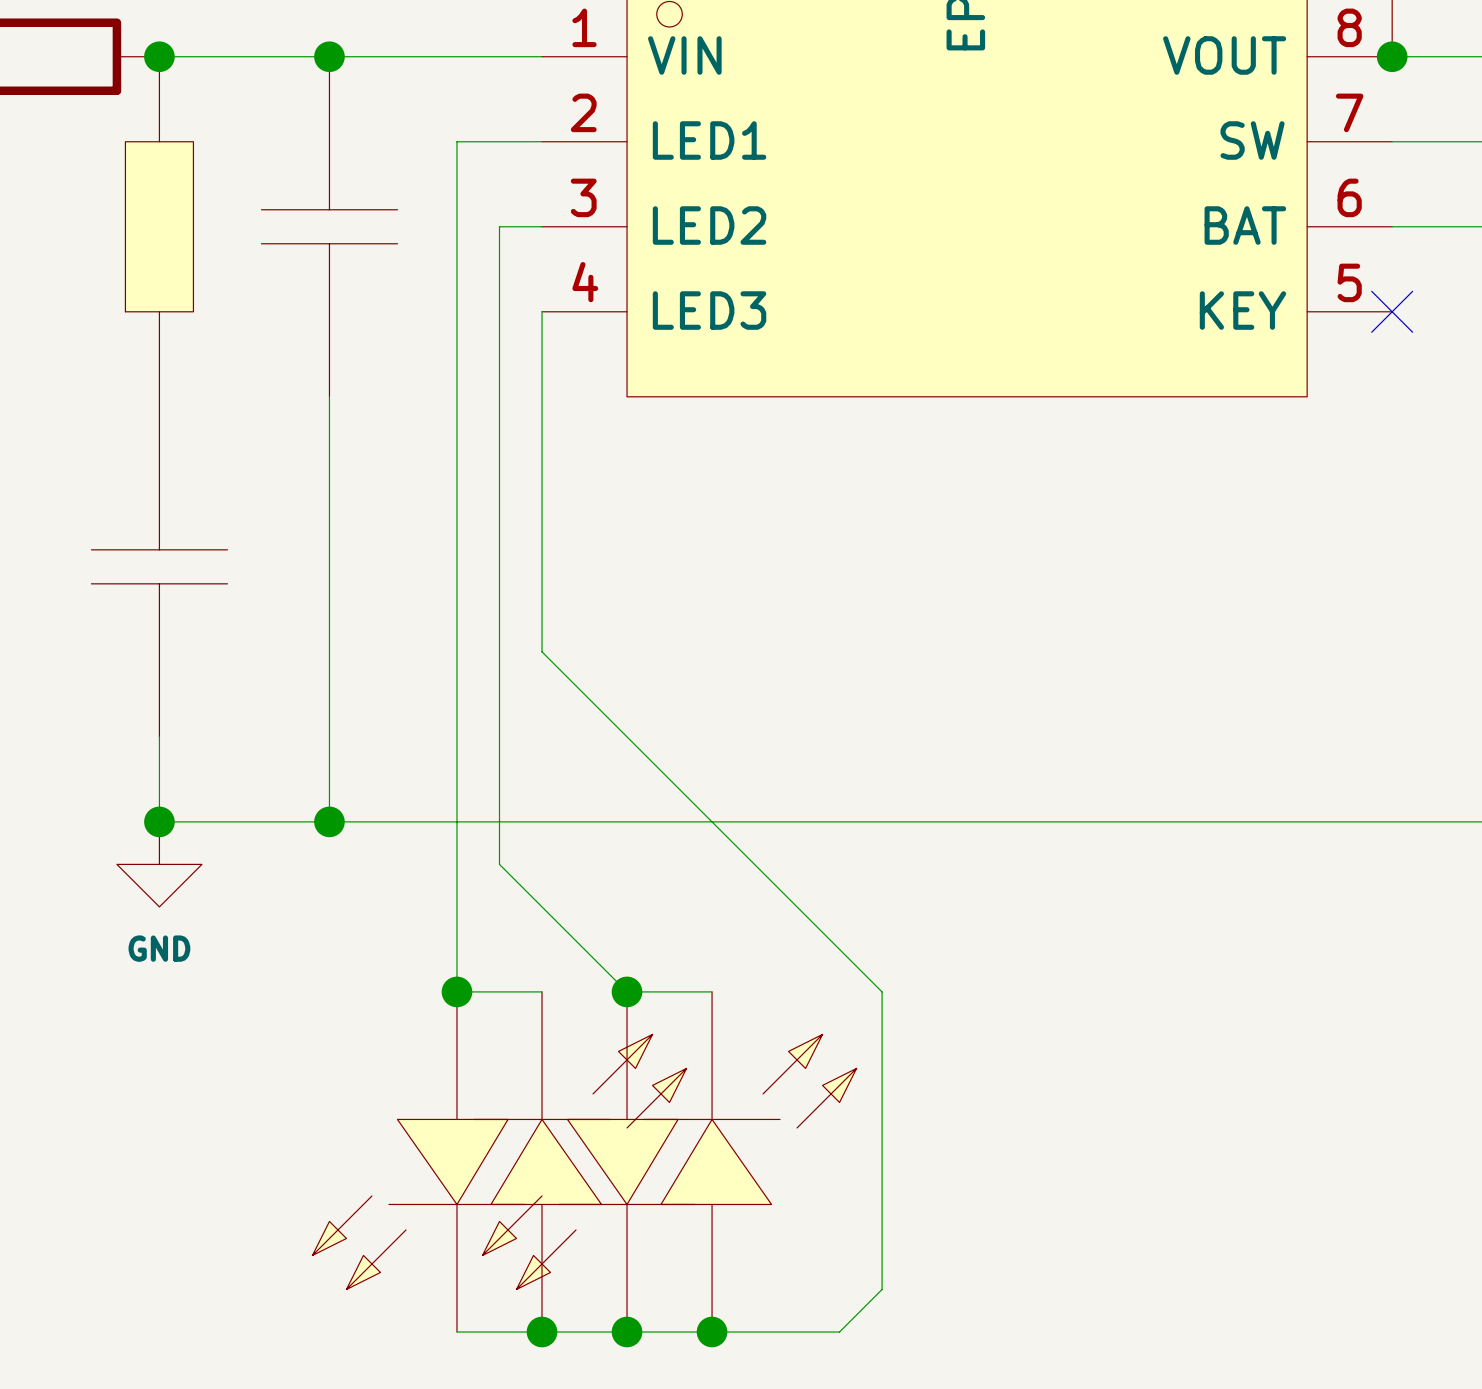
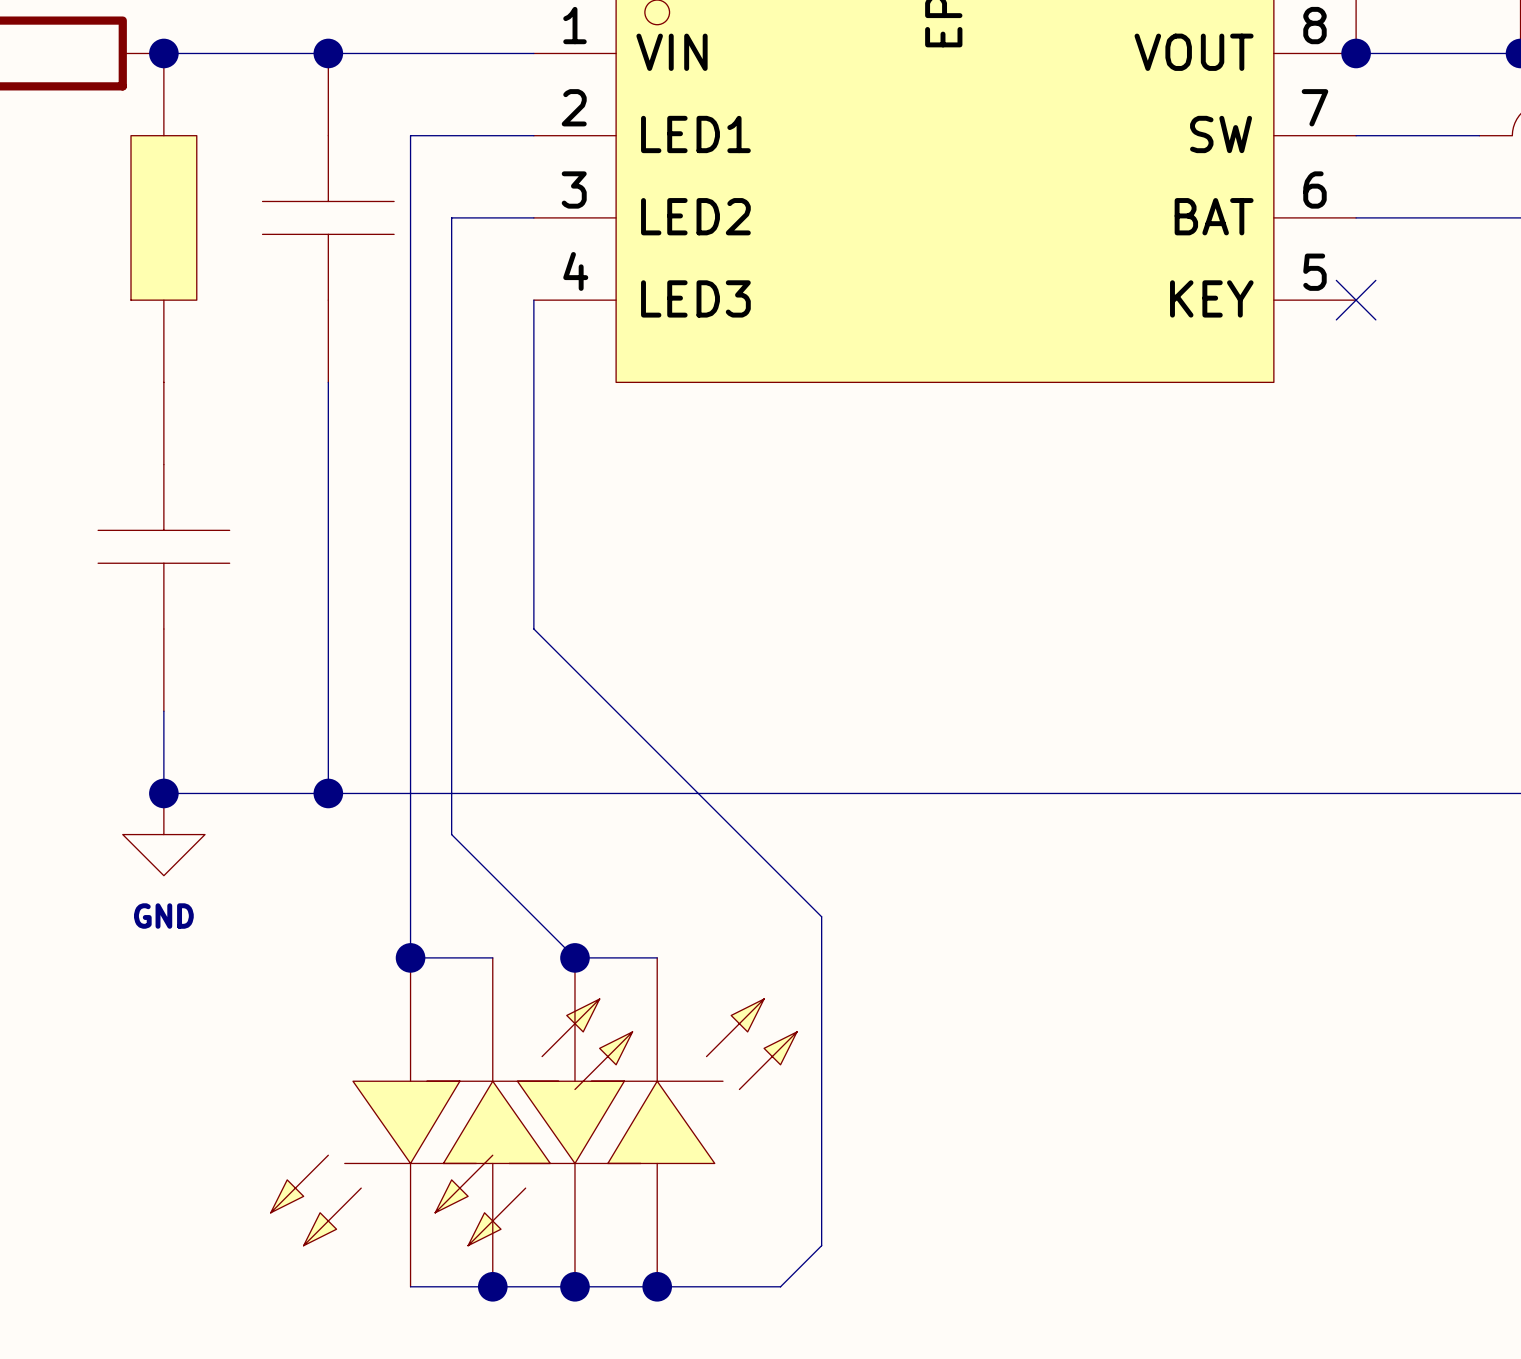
wire: (456, 141) (456, 226) -> (492, 217) (451, 217)
wire: none -> (451, 135) (410, 135) (410, 957) (451, 957)
wire: (499, 226) (499, 864) (627, 991) -> none
wire: (456, 864) (456, 991) -> (451, 834) (574, 957) (616, 957)
wire: (839, 949) (882, 991) (882, 1289) (839, 1331) (797, 1331) -> (821, 916) (821, 1245) (780, 1286)
junction position: (456, 991) -> (410, 957)
wire: (499, 991) (542, 991) -> (410, 1286) (451, 1286)
junction position: (627, 991) -> (574, 957)
wire: (669, 991) (712, 991) -> none
part position: (418, 1161) -> (373, 1122)
part: none -> (529, 1122)
part: none -> (537, 1122)
part: (580, 1161) -> none
part: (588, 1161) -> none
part position: (750, 1161) -> (694, 1122)
junction: none -> (492, 1286)
junction: (542, 1331) -> none
junction: none -> (574, 1286)
junction: (627, 1331) -> none
junction: none -> (657, 1286)
junction: (712, 1331) -> none

